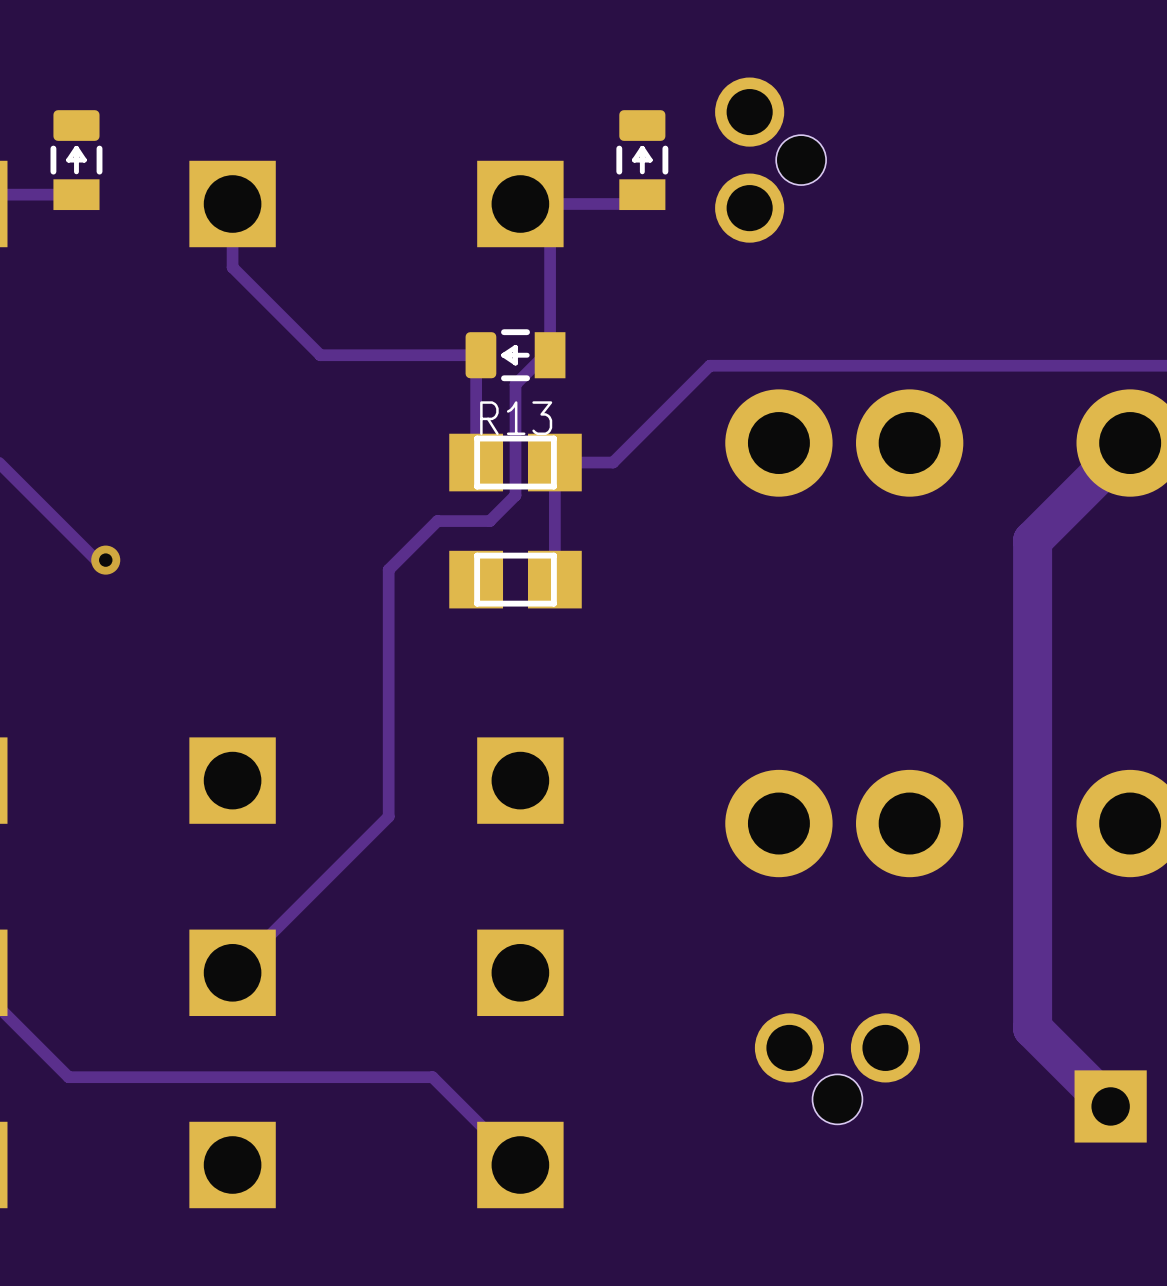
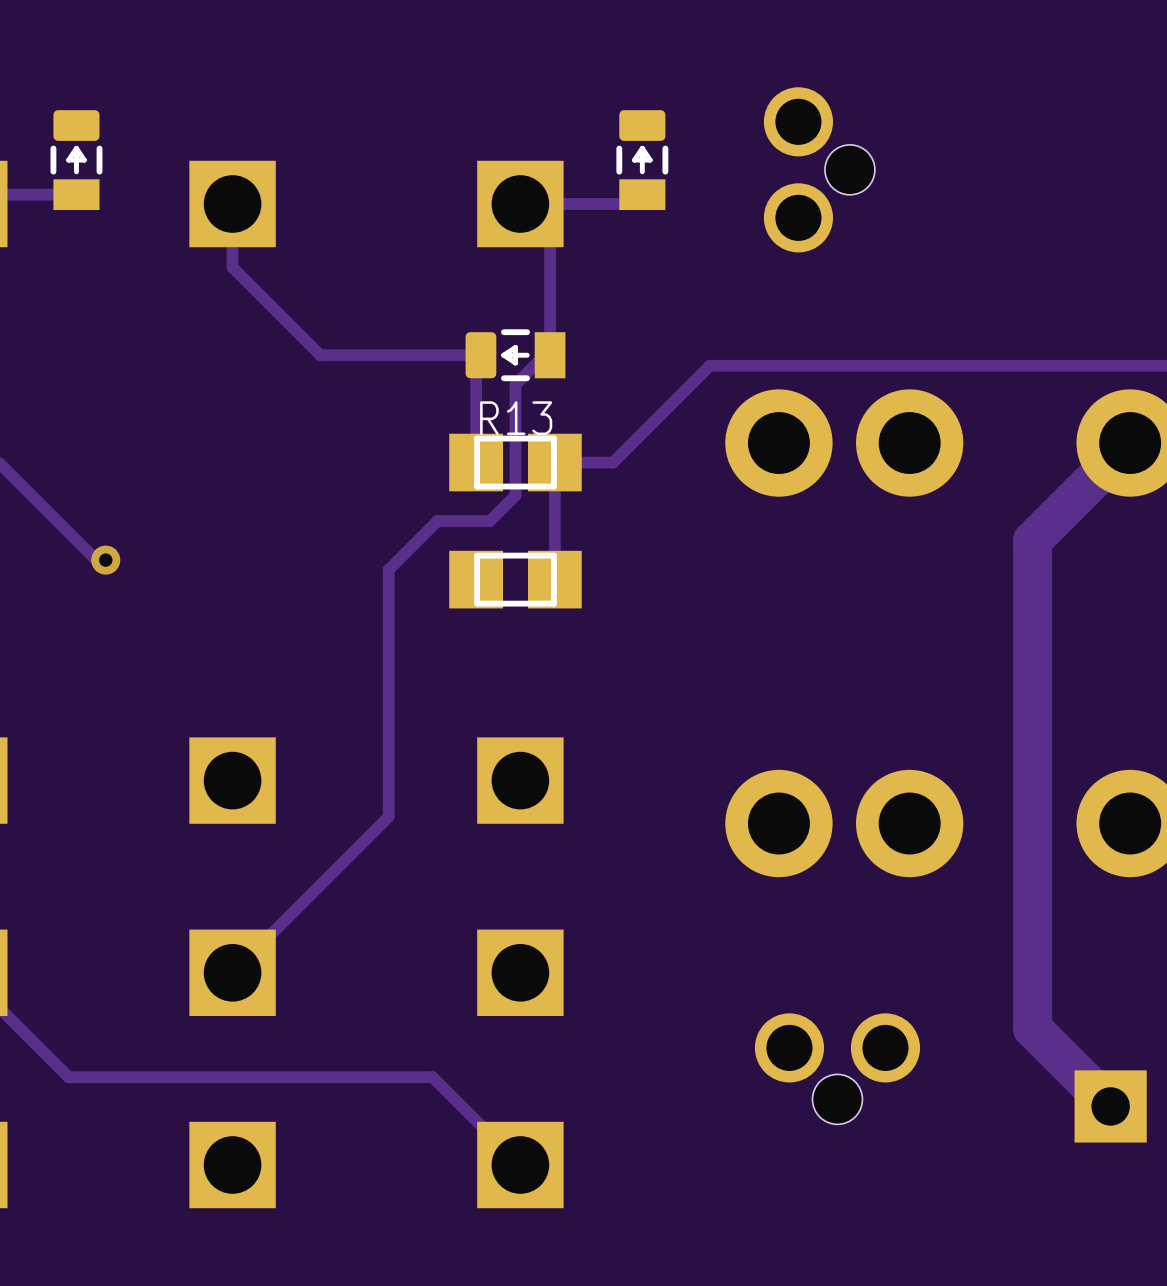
part position: (770, 160) -> (819, 169)

